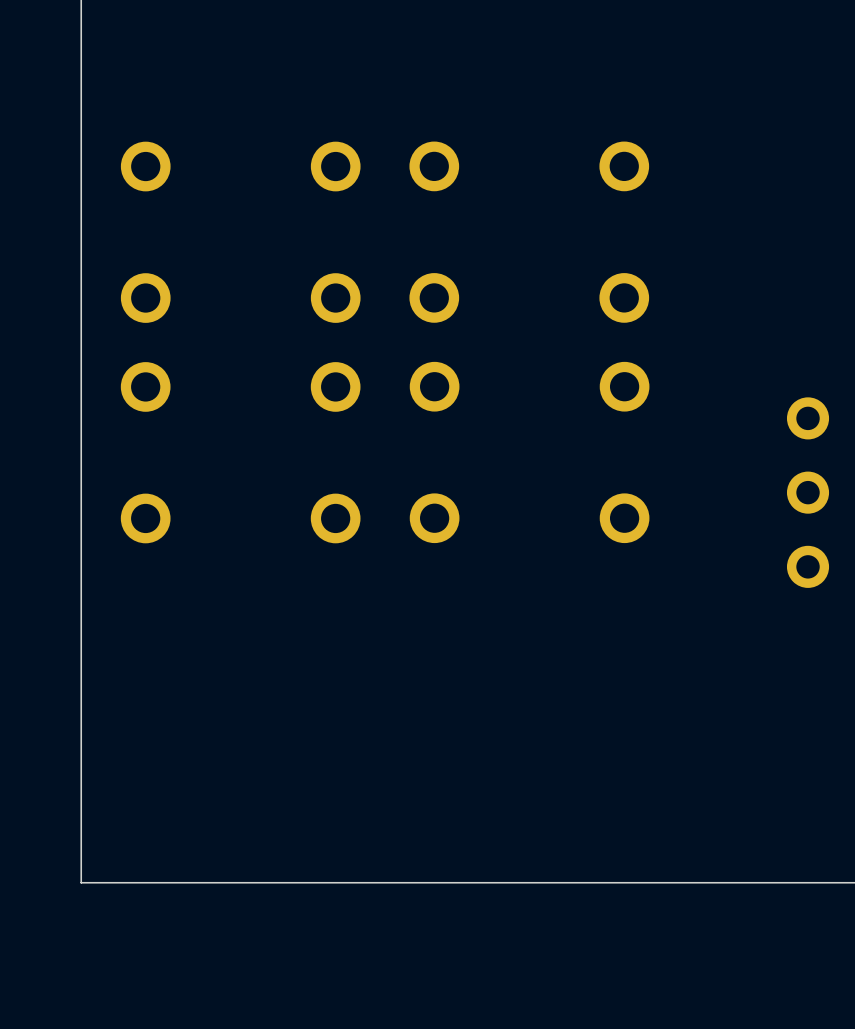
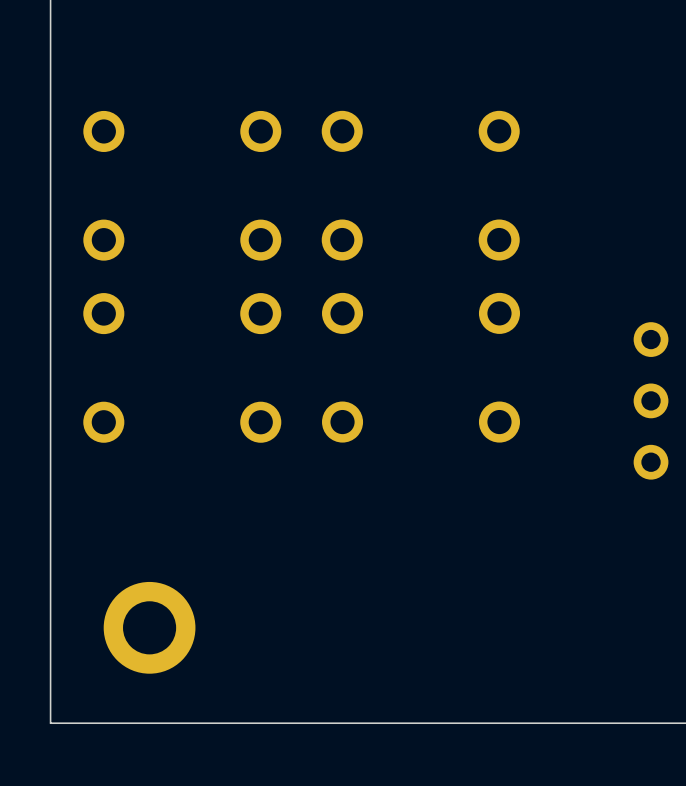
part: none -> (149, 627)

